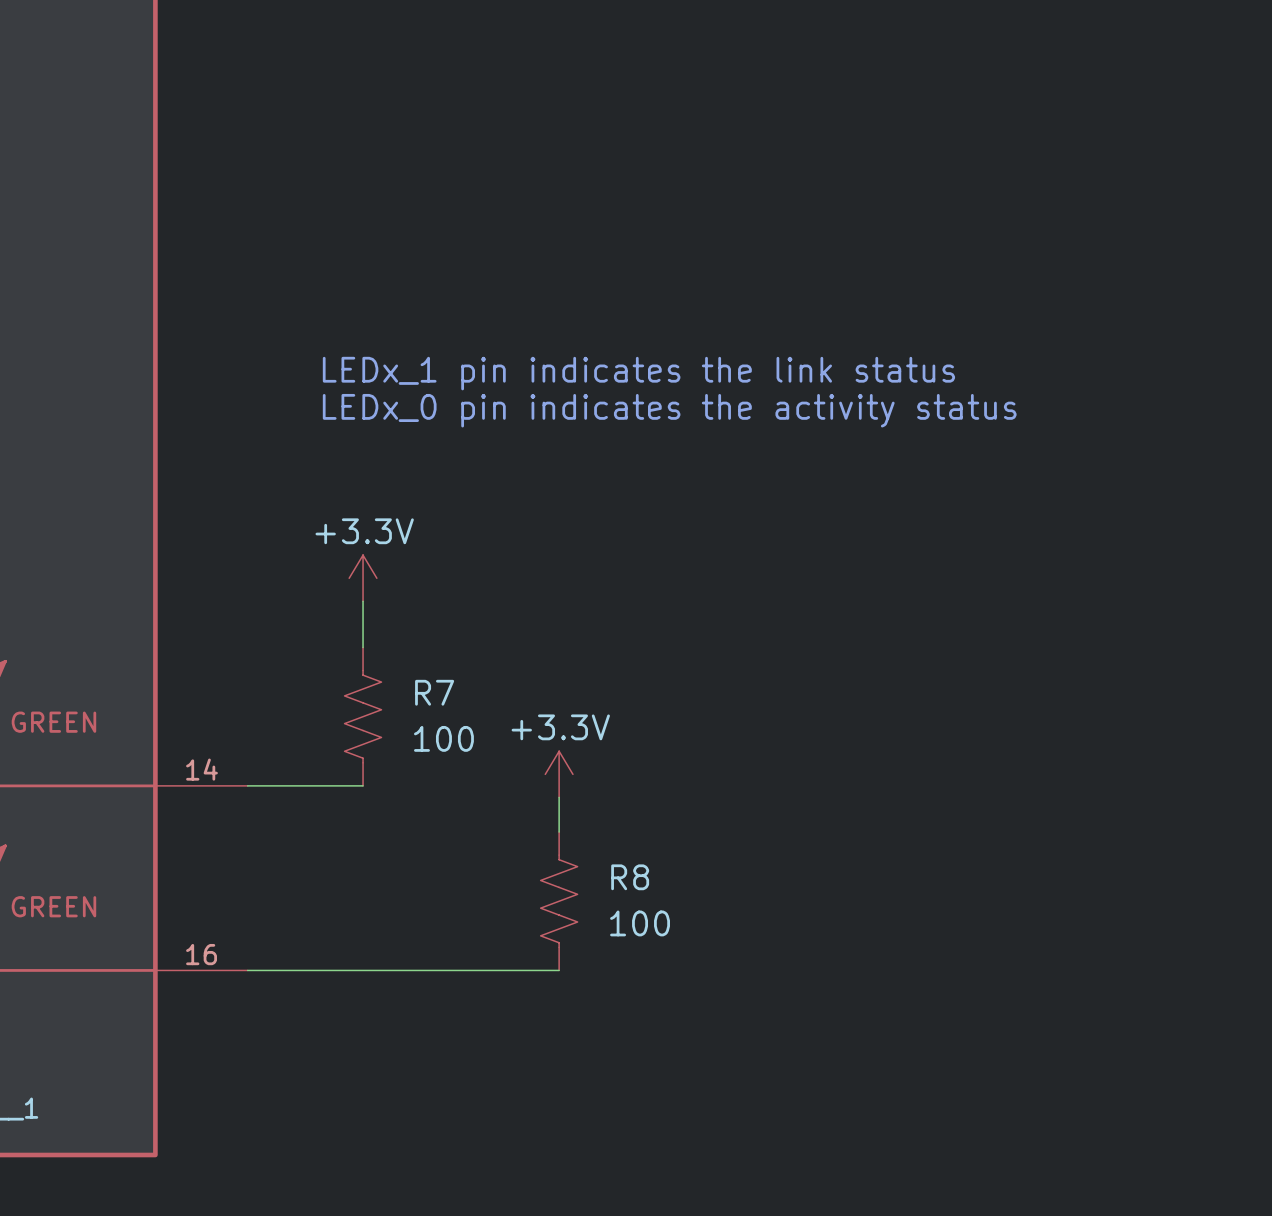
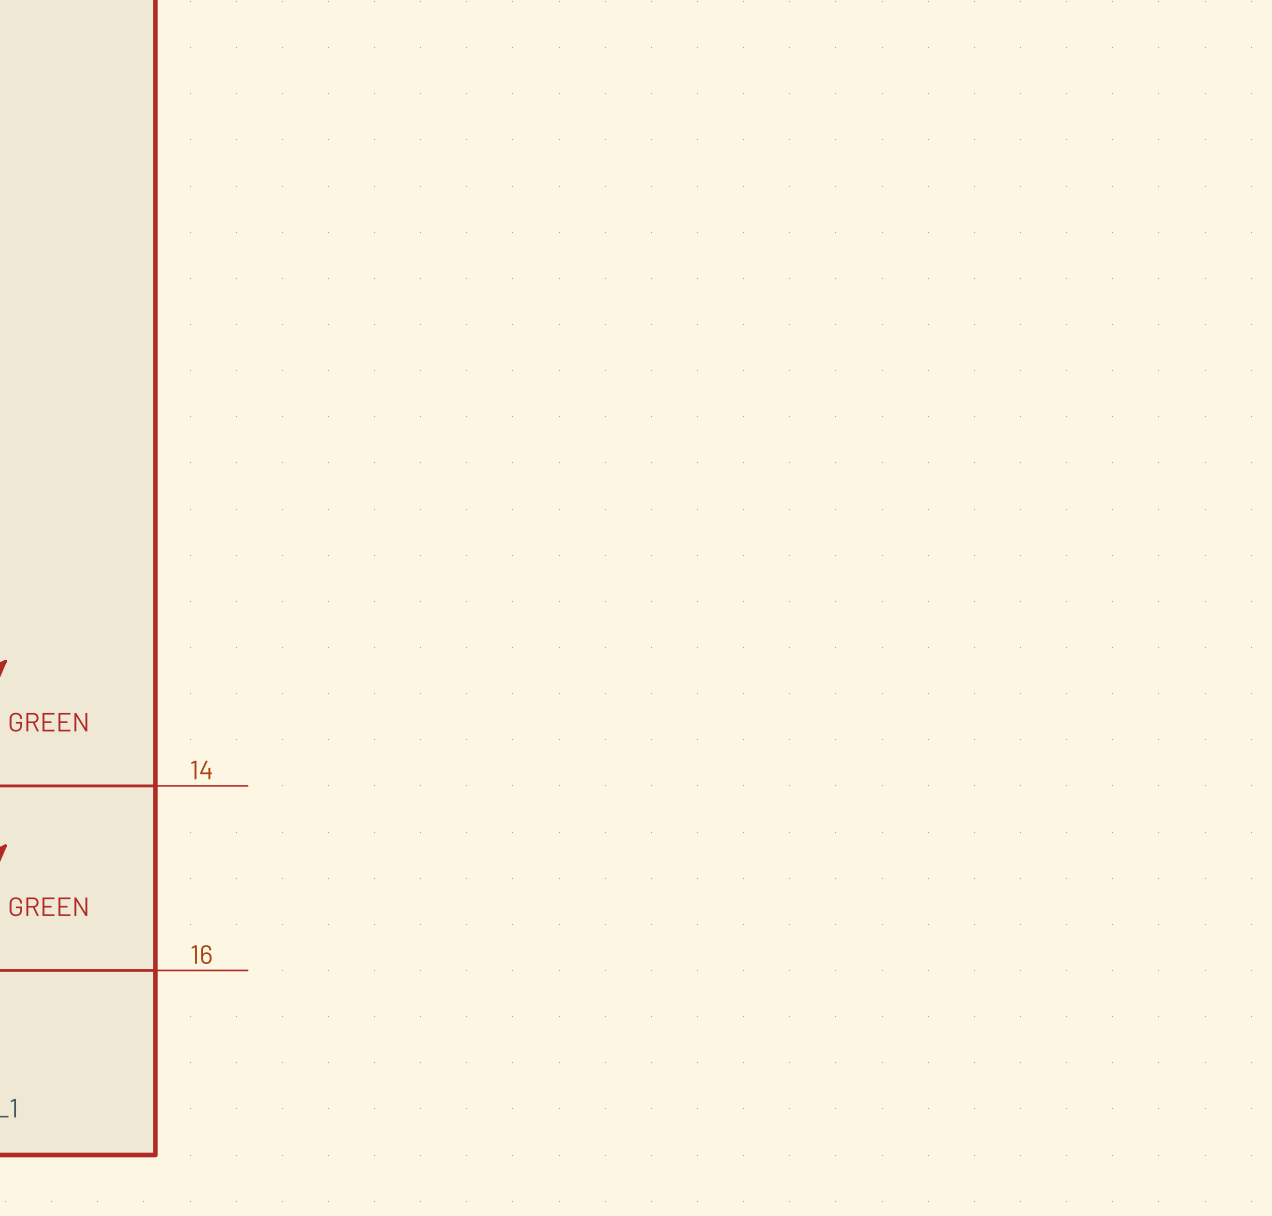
text: LEDx_1 pin indicates the link status (638, 373) -> none
text: LEDx_0 pin indicates the activity status (669, 410) -> none
power symbol: +3.3V (363, 578) -> none
wire: (363, 601) (363, 647) -> none
R7: 100 (363, 716) -> none
power symbol: +3.3V (559, 774) -> none
wire: (247, 785) (363, 785) -> none
wire: (559, 797) (559, 832) -> none
R8: 100 (559, 901) -> none
wire: (247, 970) (559, 970) -> none

